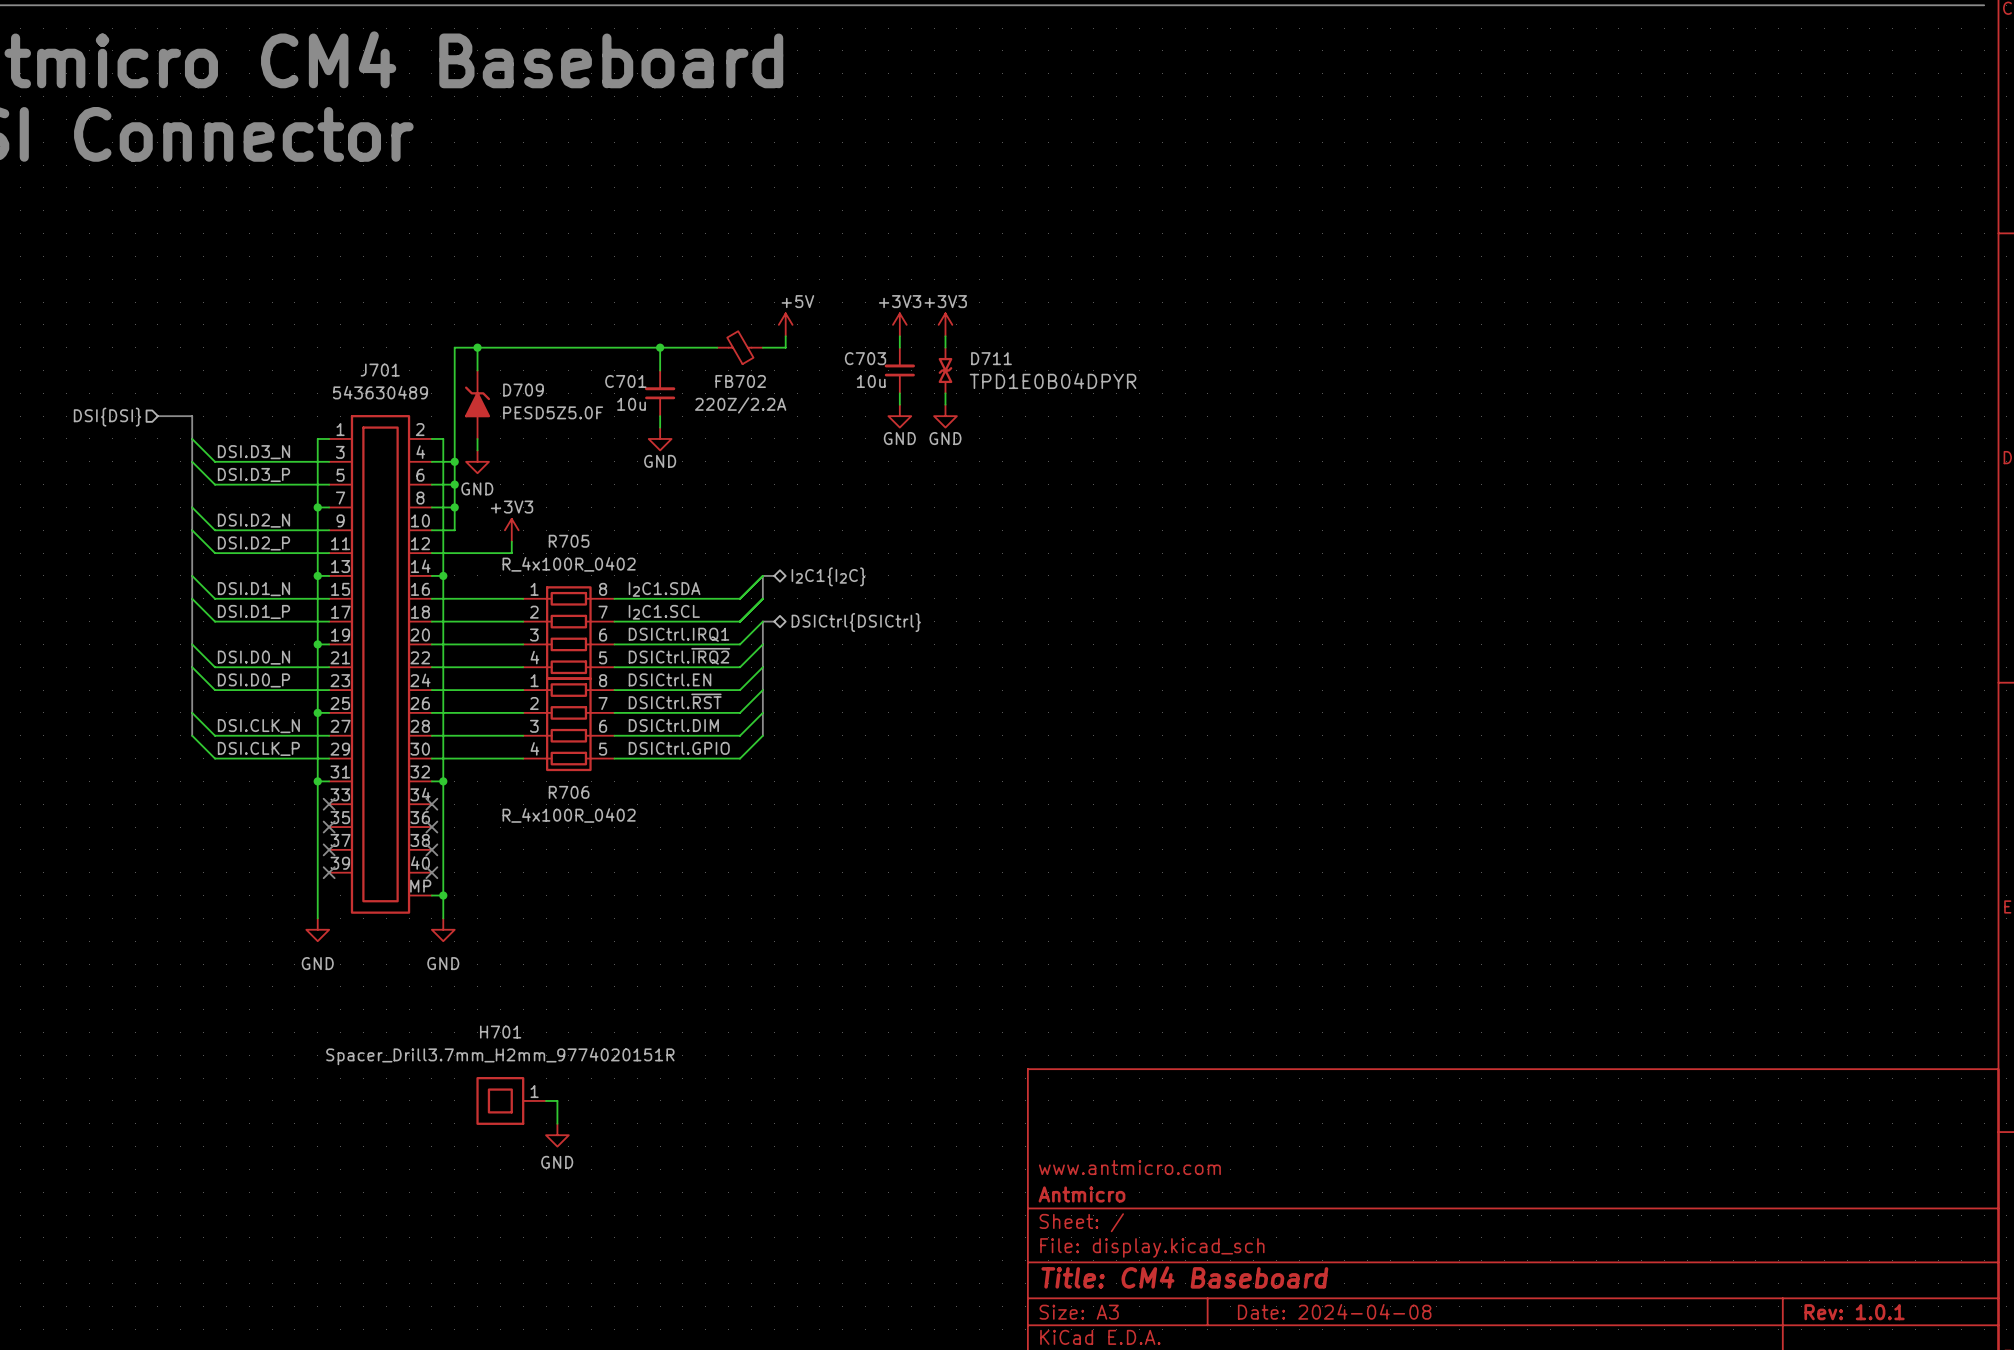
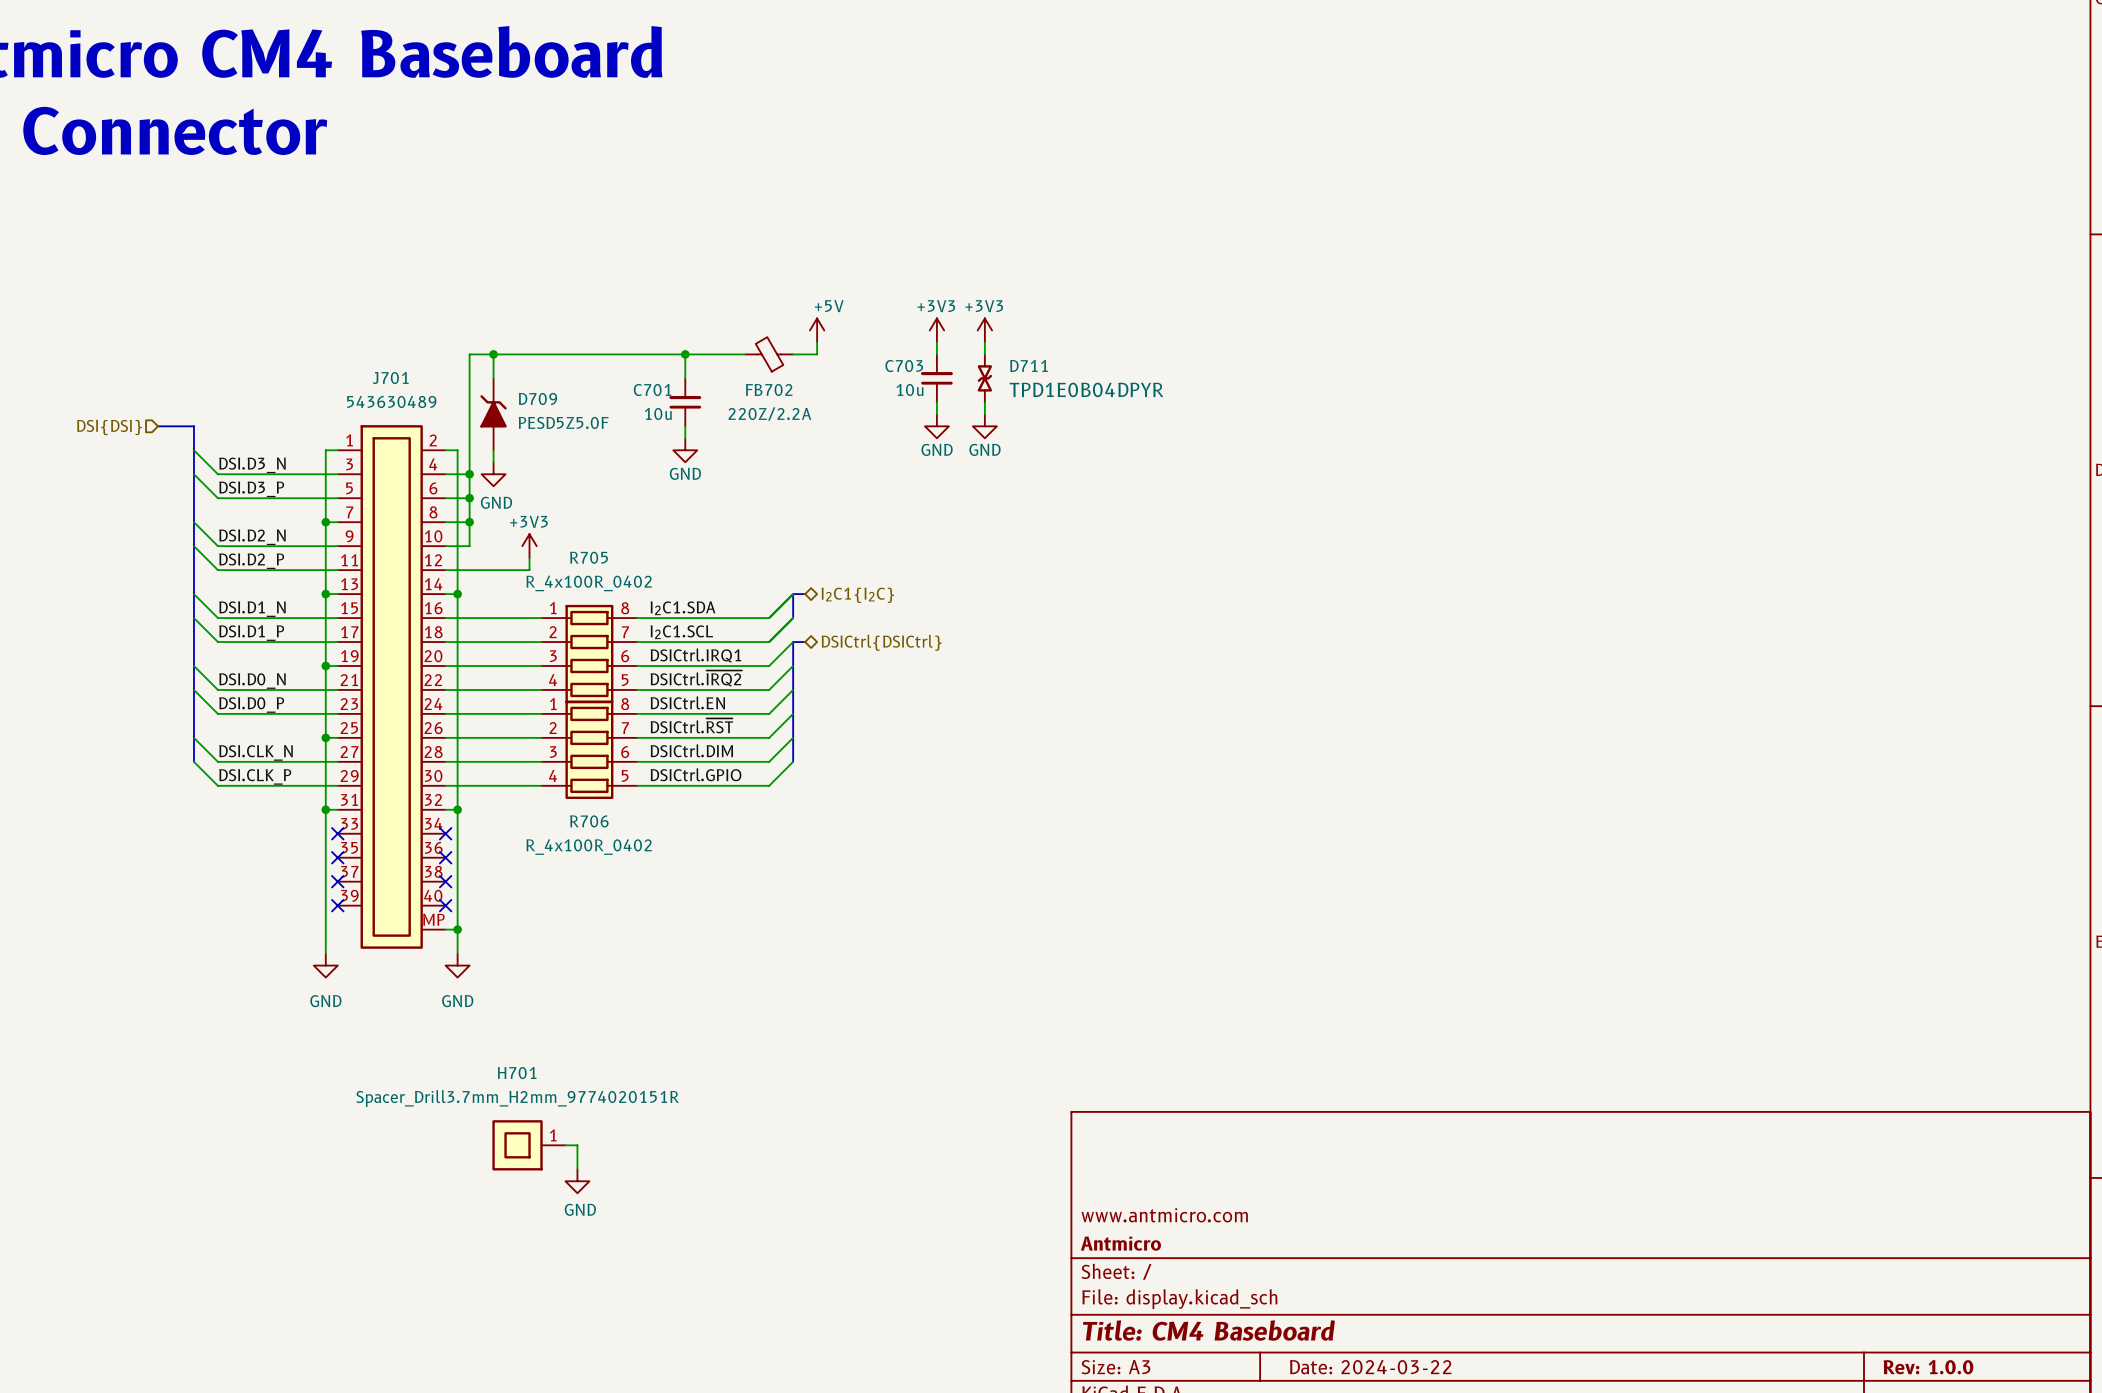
title block: Date: 2024-04-08 (1334, 1311) -> Date: 2024-03-22 (1370, 1367)
title block: Rev: 1.0.1 (1854, 1312) -> Rev: 1.0.0 (1928, 1367)

